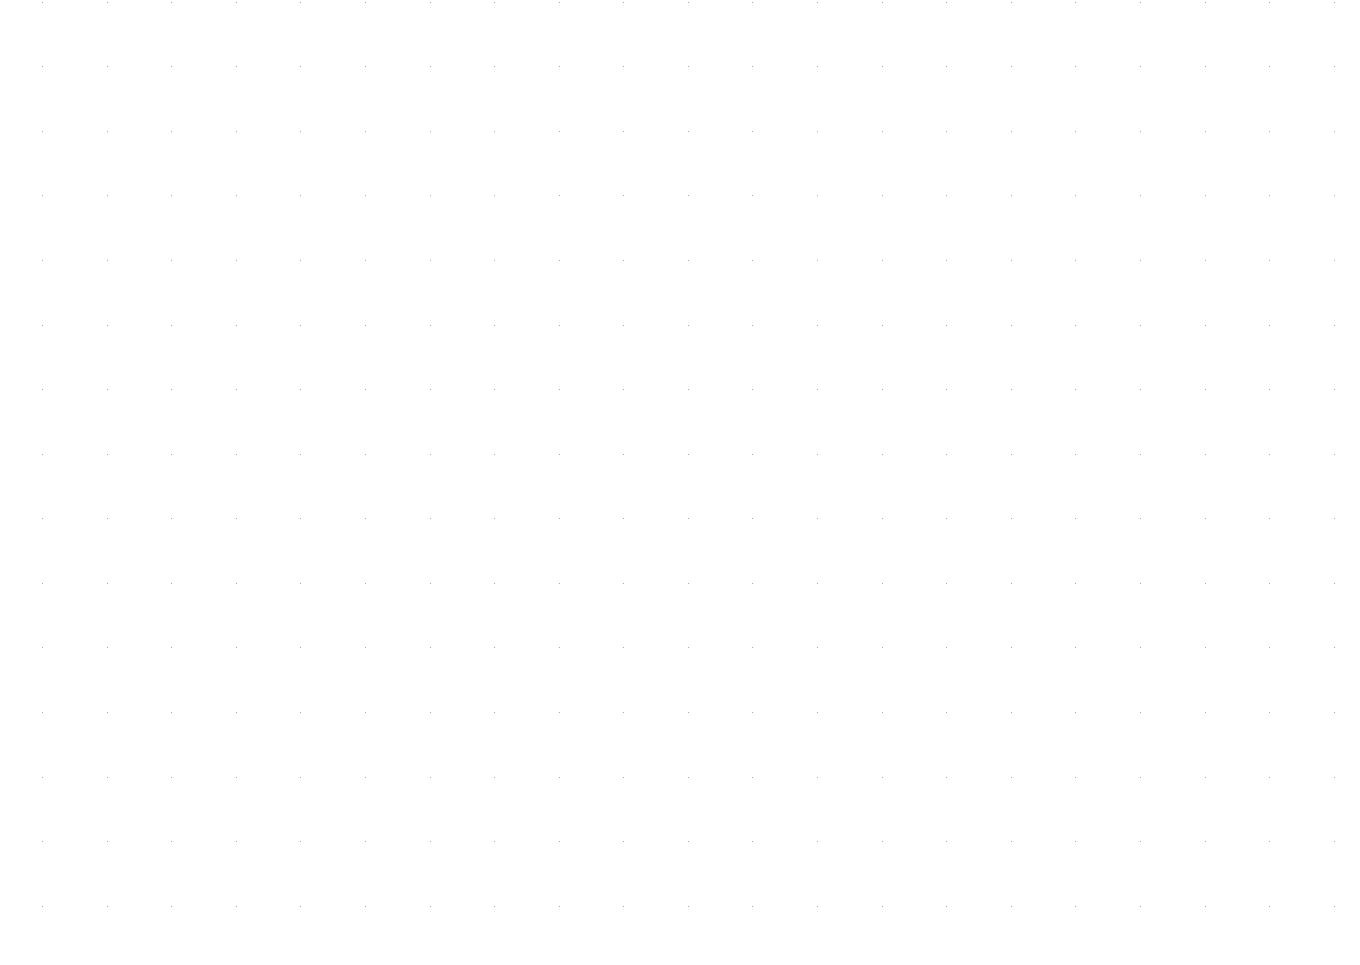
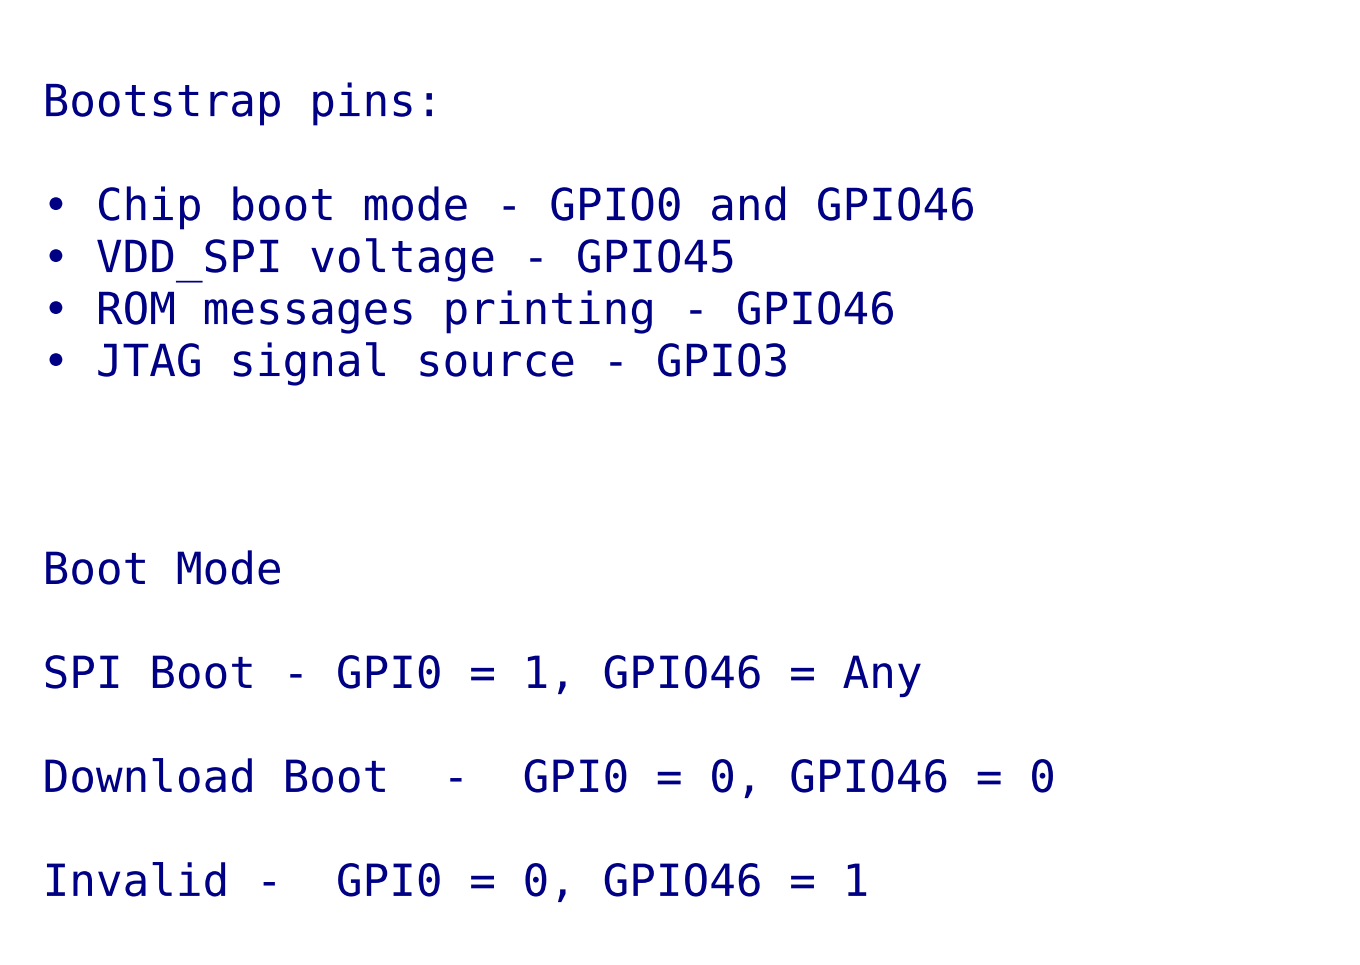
text: none -> Bootstrap pins: (239, 103)
text: none -> • Chip boot mode - GPIO0 and GPIO46 (511, 207)
text: none -> • VDD_SPI voltage - GPIO45 (390, 260)
text: none -> • ROM messages printing - GPIO46 (471, 312)
text: none -> • JTAG signal source - GPIO3 (417, 363)
text: none -> Boot Mode (163, 567)
text: none -> SPI Boot - GPI0 = 1, GPIO46 = Any (483, 676)
text: none -> Download Boot - GPI0 = 0, GPIO46 = 0 (549, 778)
text: none -> Invalid - GPI0 = 0, GPIO46 = 1 (456, 882)

